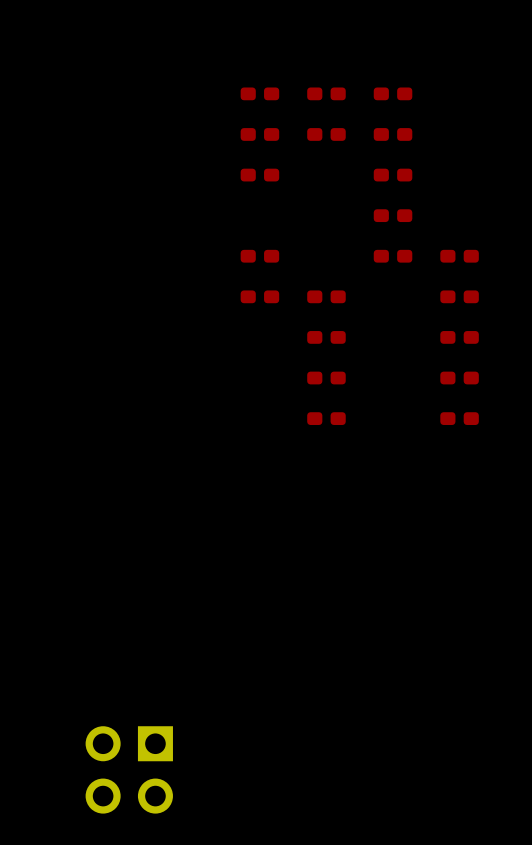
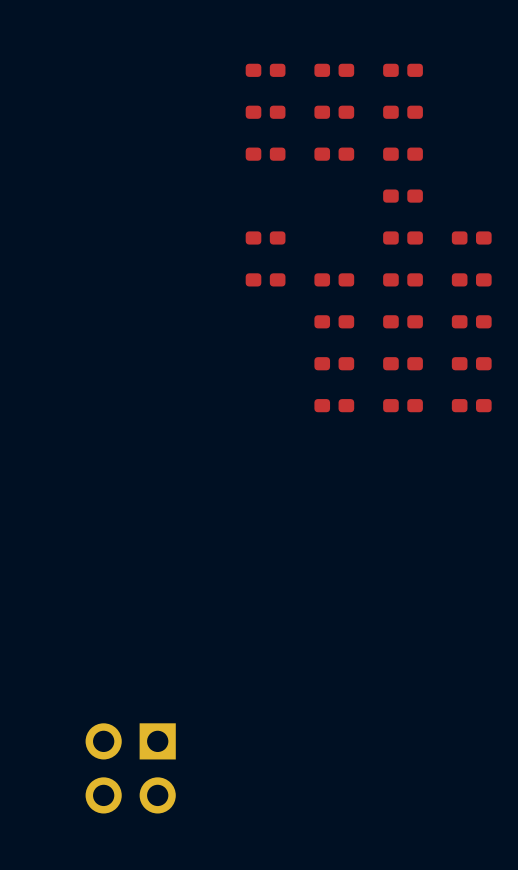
part: none -> (334, 154)
part: none -> (403, 279)
part: none -> (403, 321)
part: none -> (403, 363)
part: none -> (403, 405)

